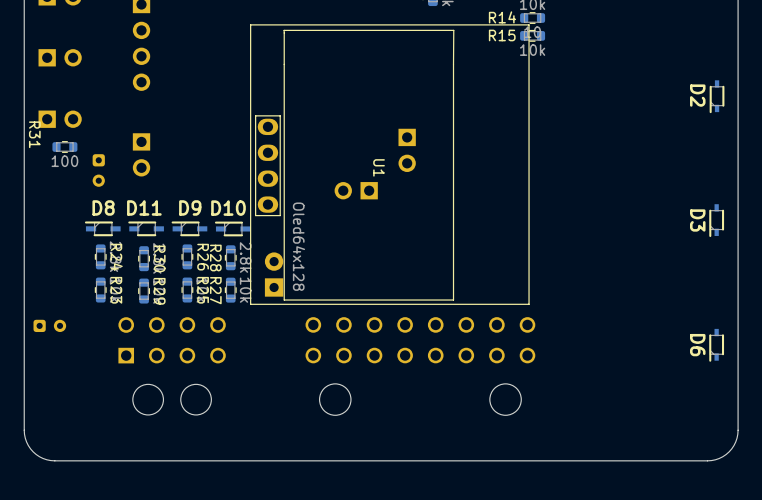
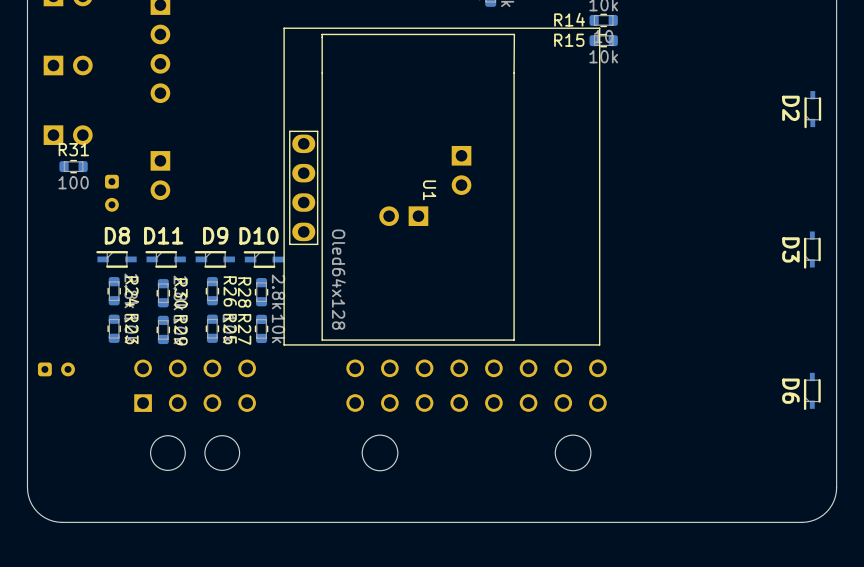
R31 name rotation: 0° (34, 134) -> 90° counterclockwise (73, 149)
part: (274, 274) -> none

